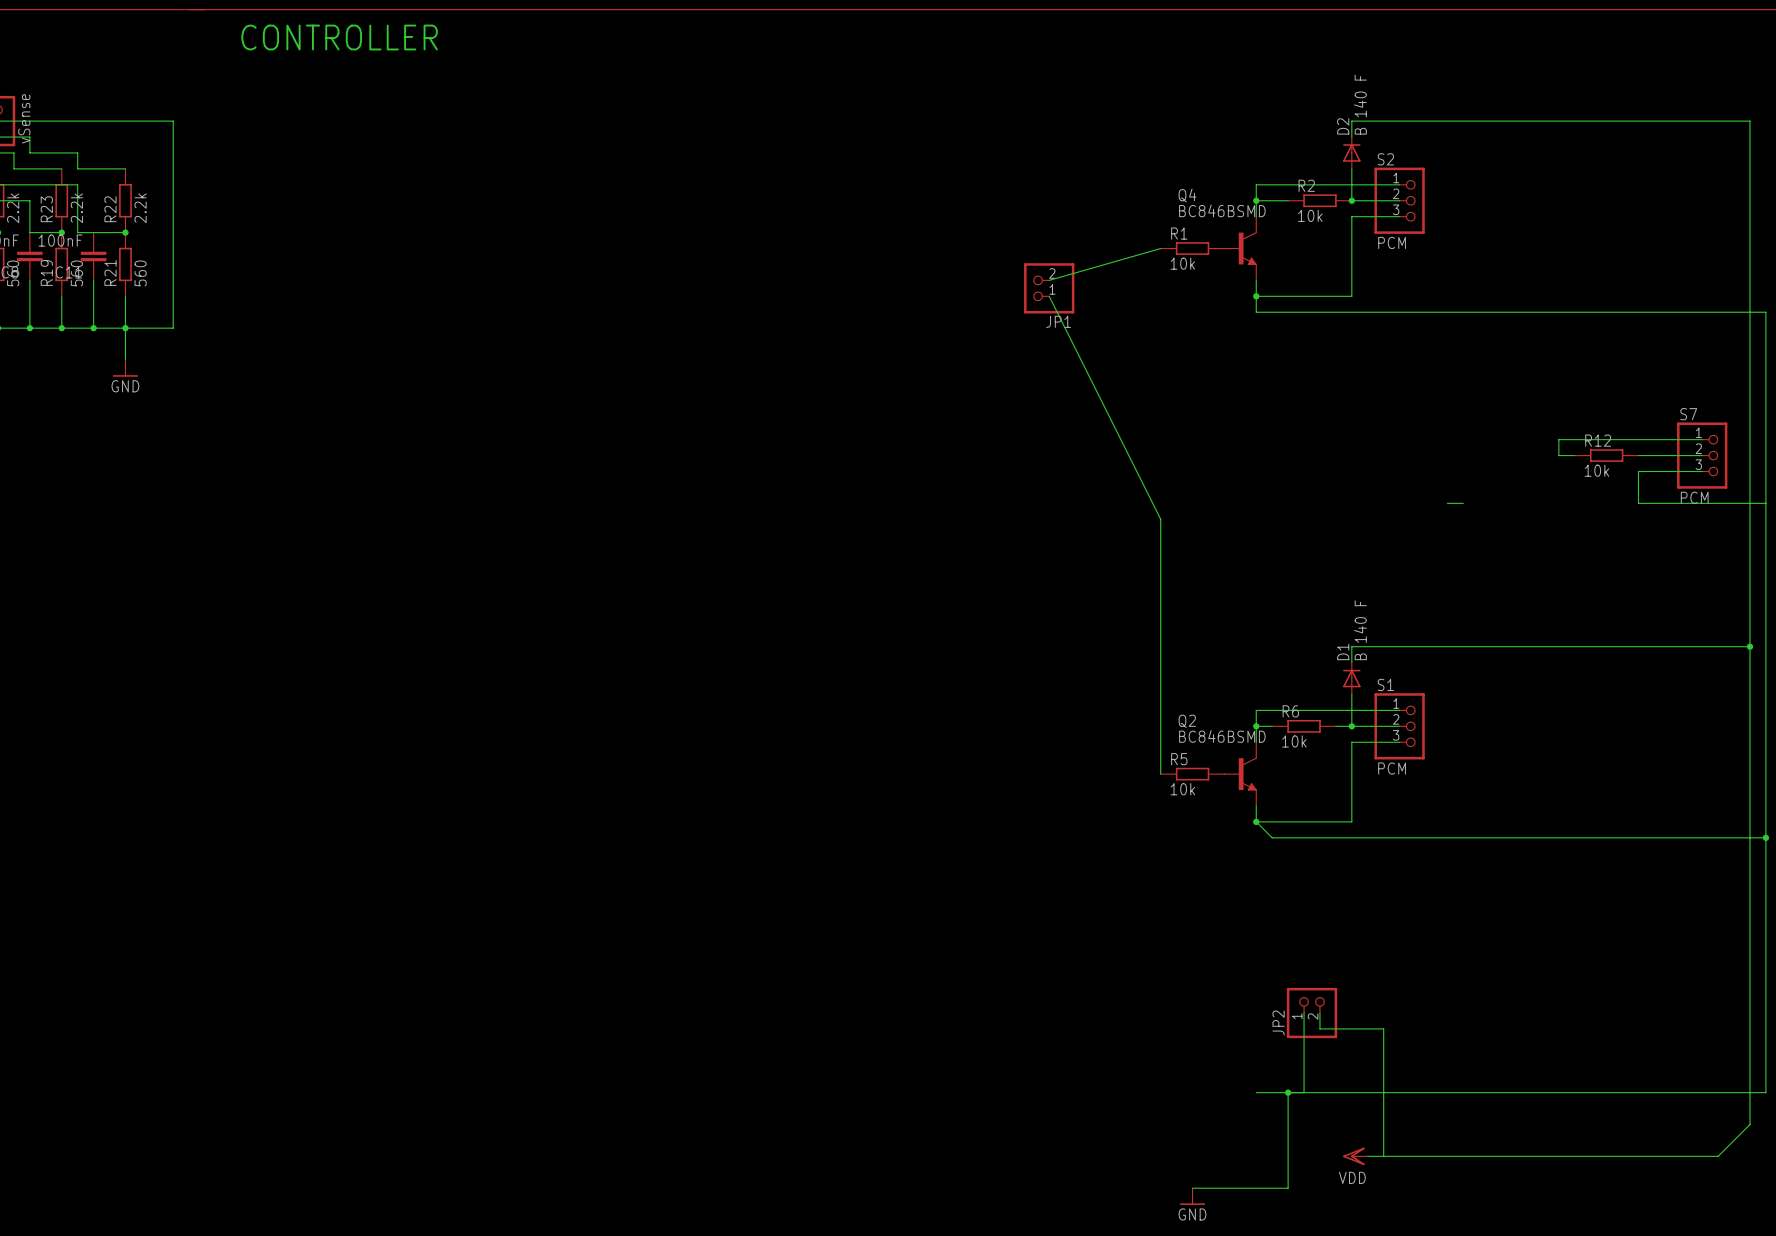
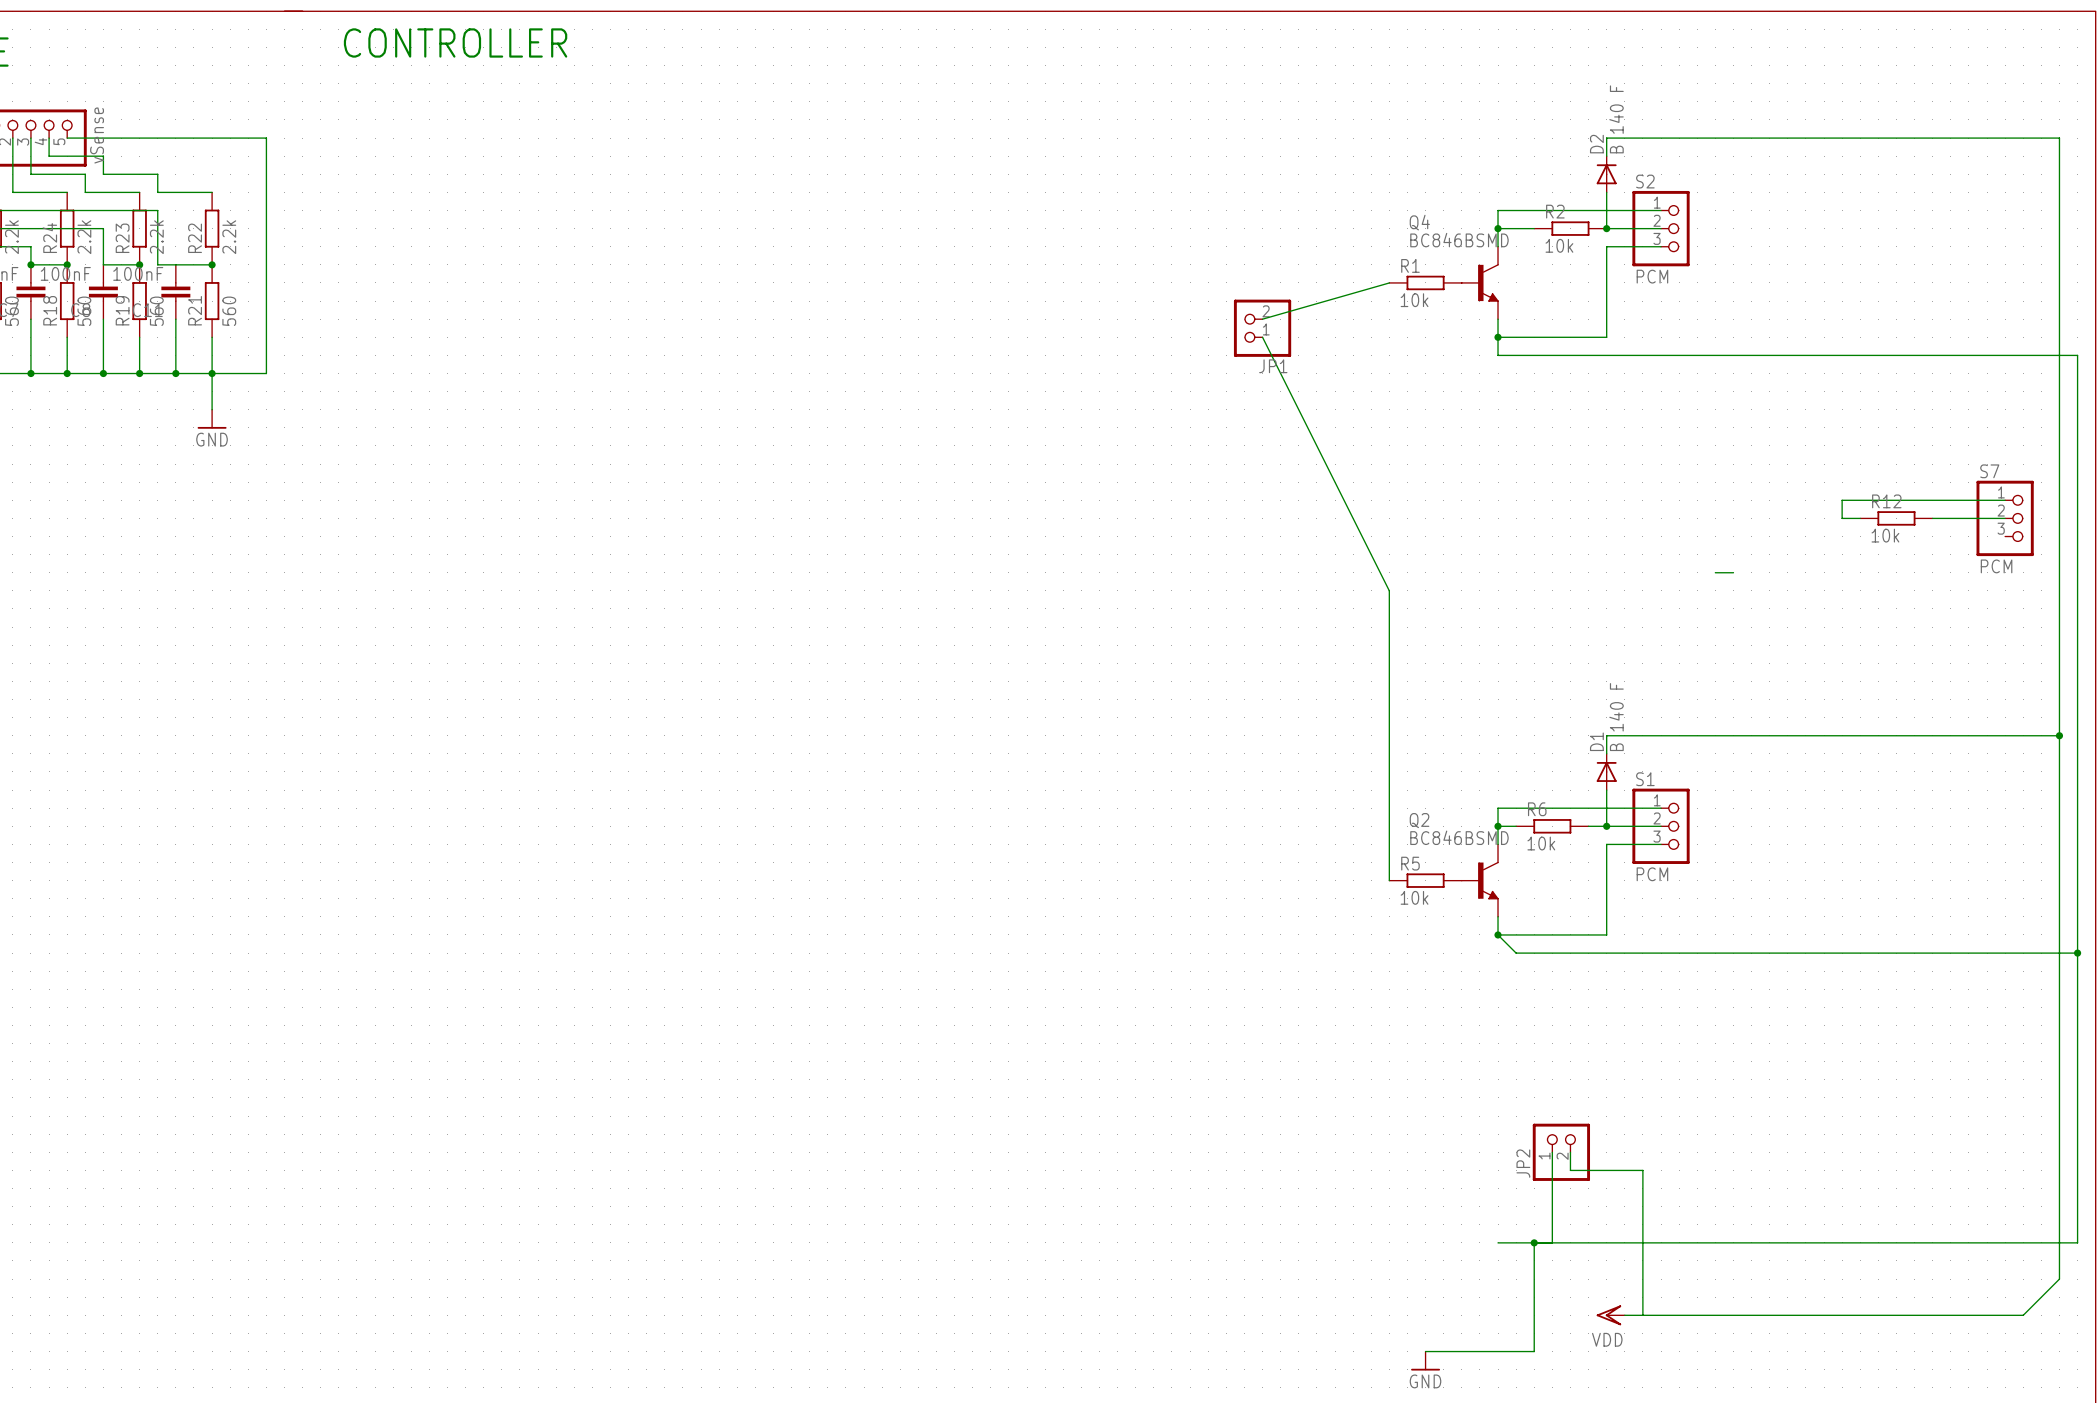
wire: (1702, 471) (1638, 471) (1638, 503) (1765, 503) -> none

